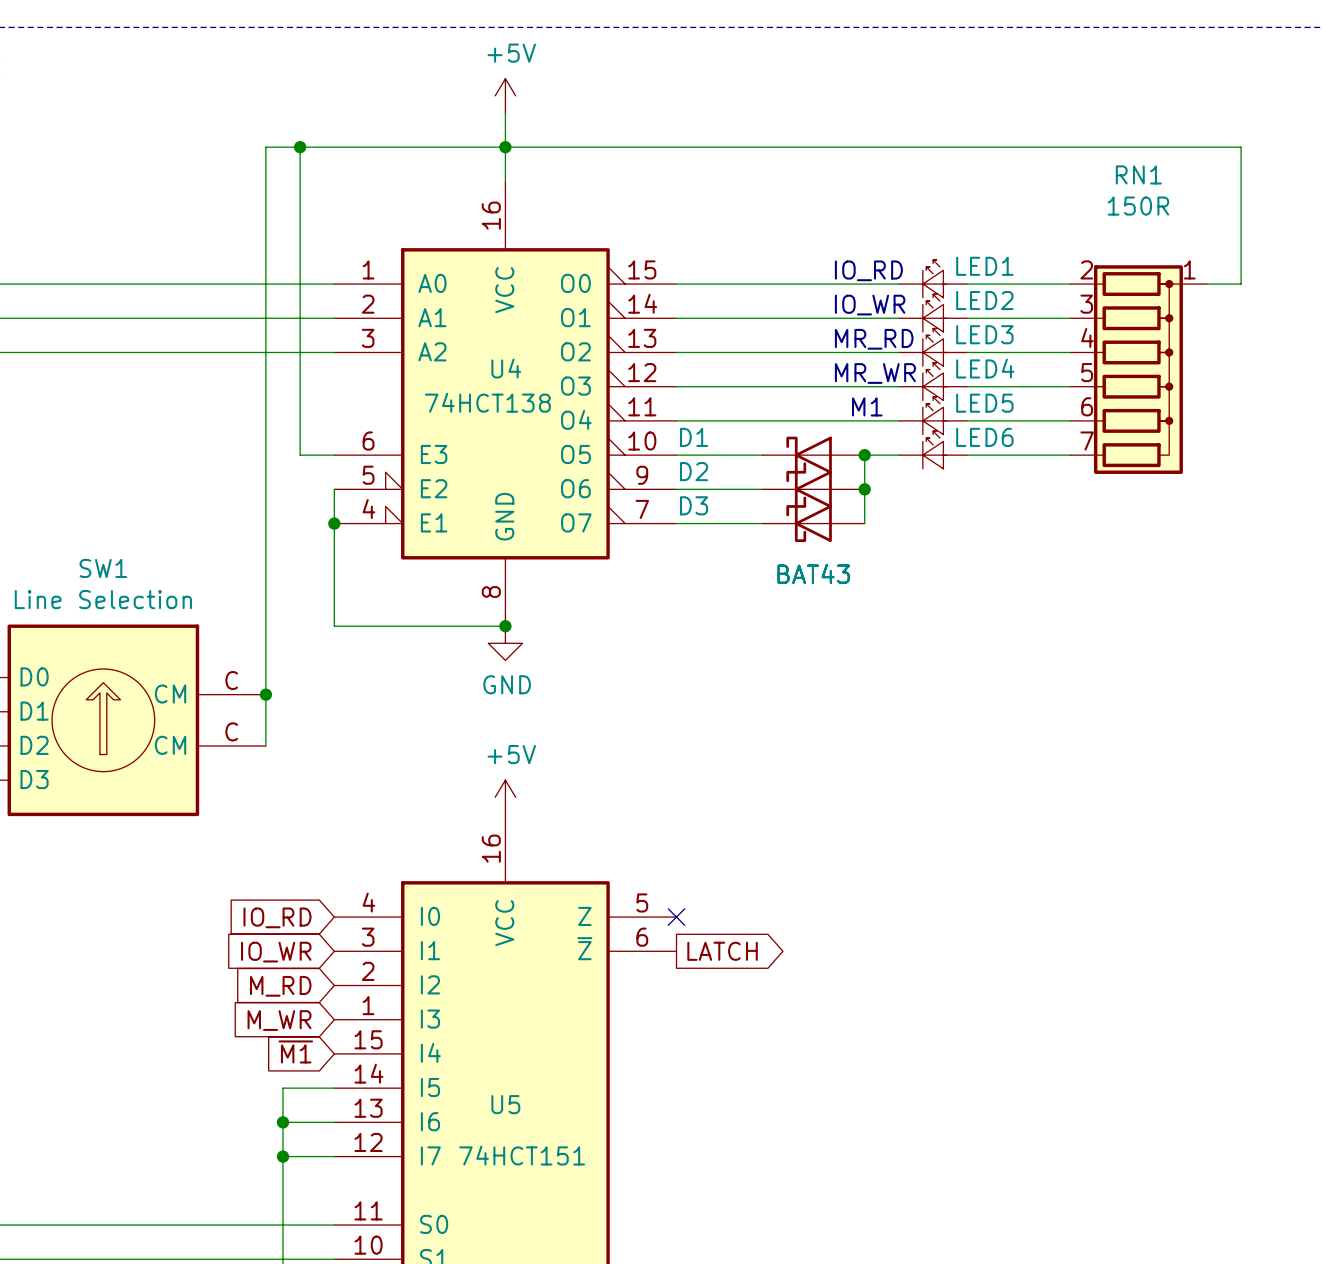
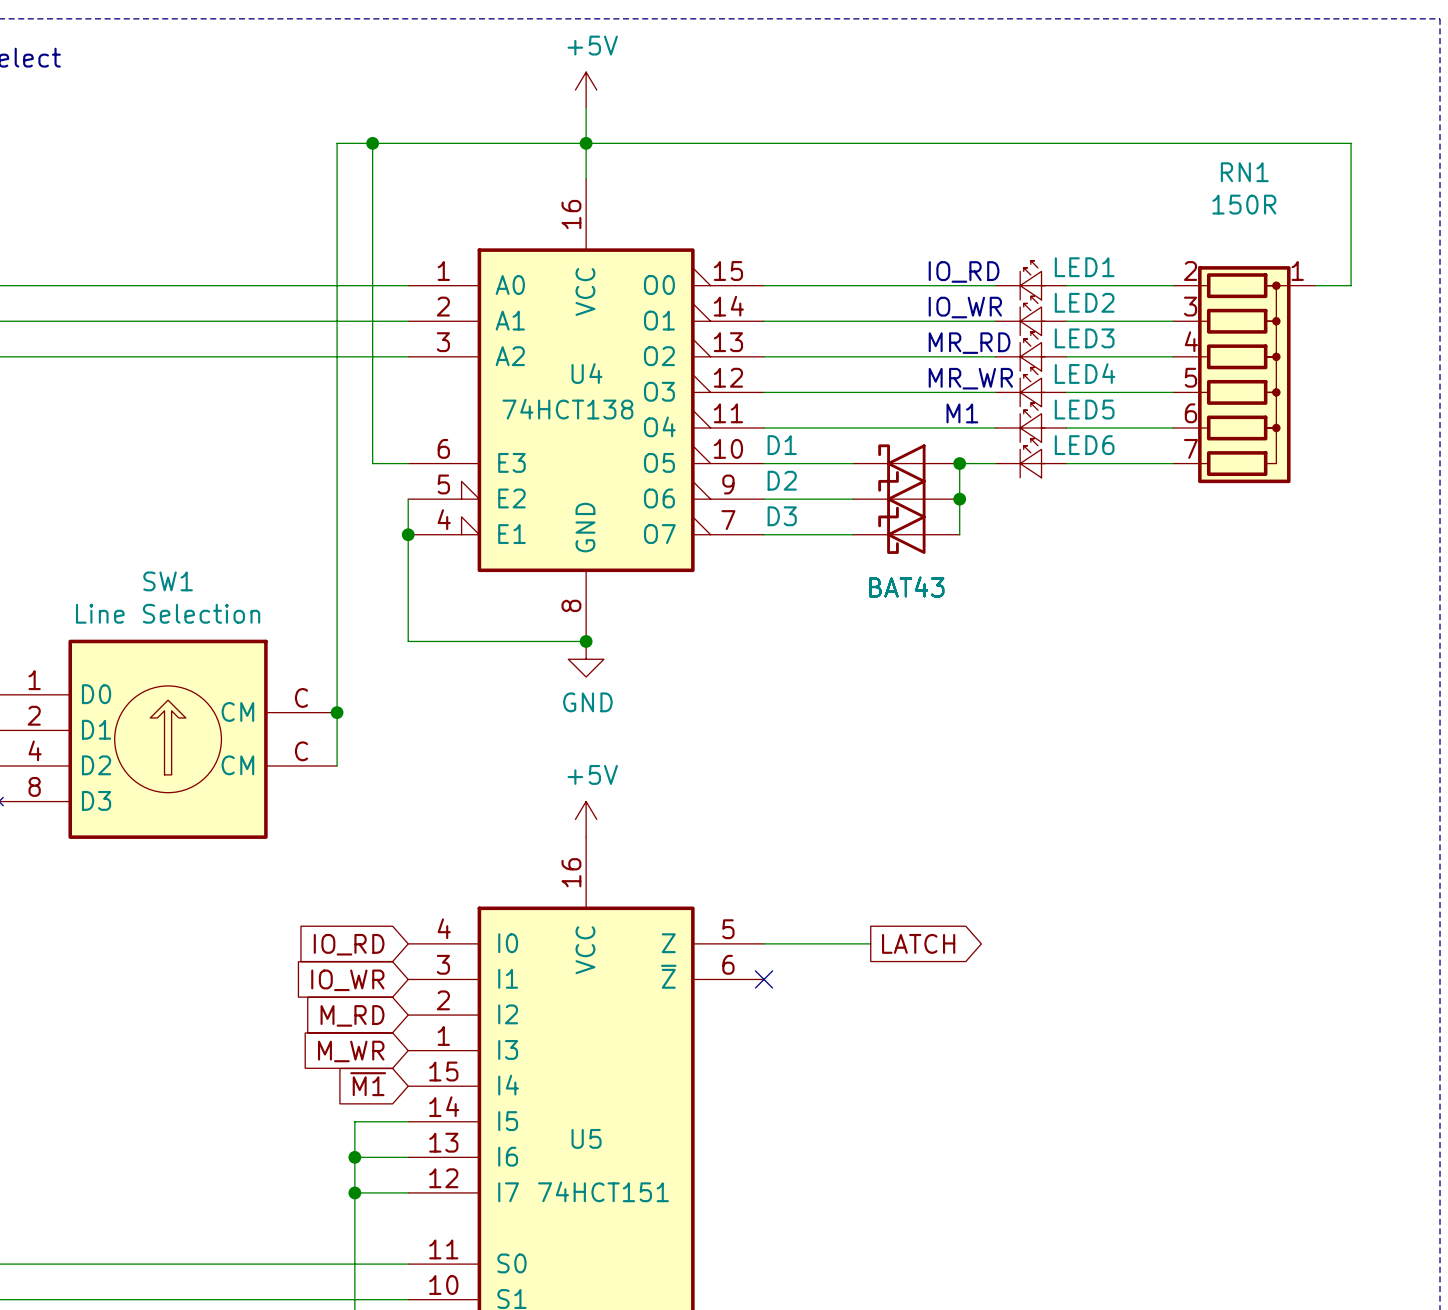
wire: none -> (764, 943) (870, 943)
no-connect mark position: (676, 917) -> (764, 979)
global label position: LATCH (722, 951) -> LATCH (918, 943)

